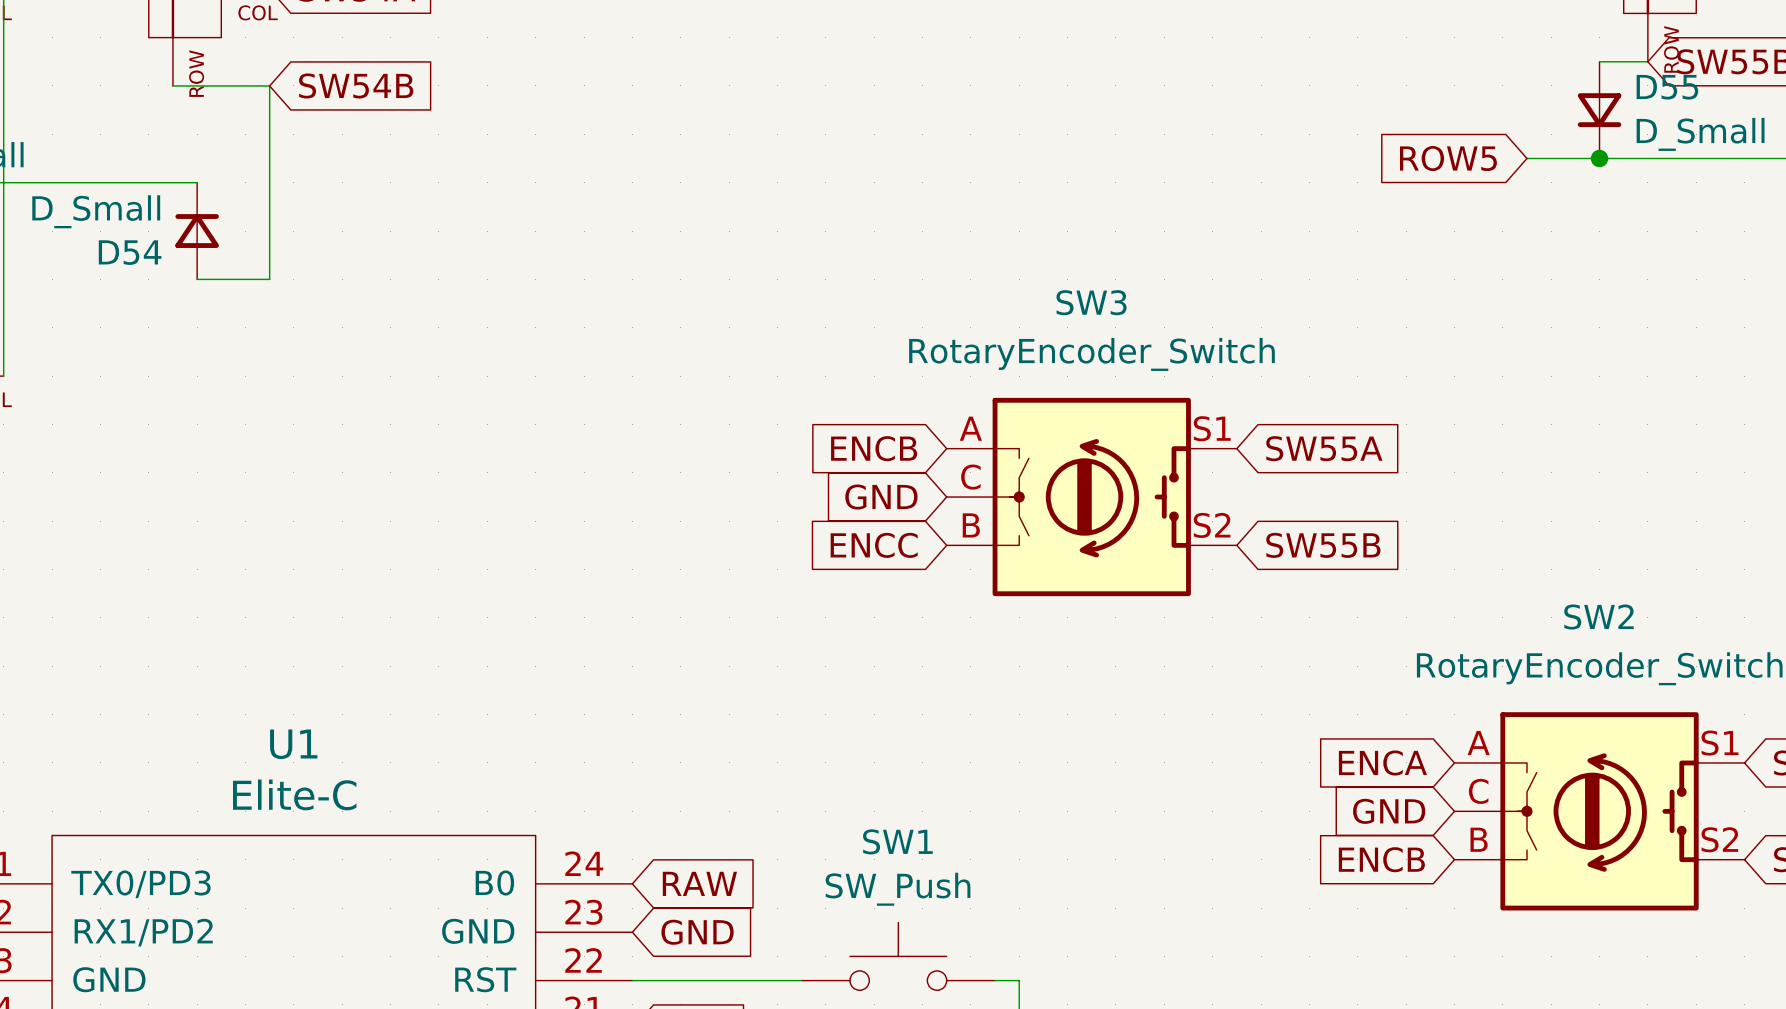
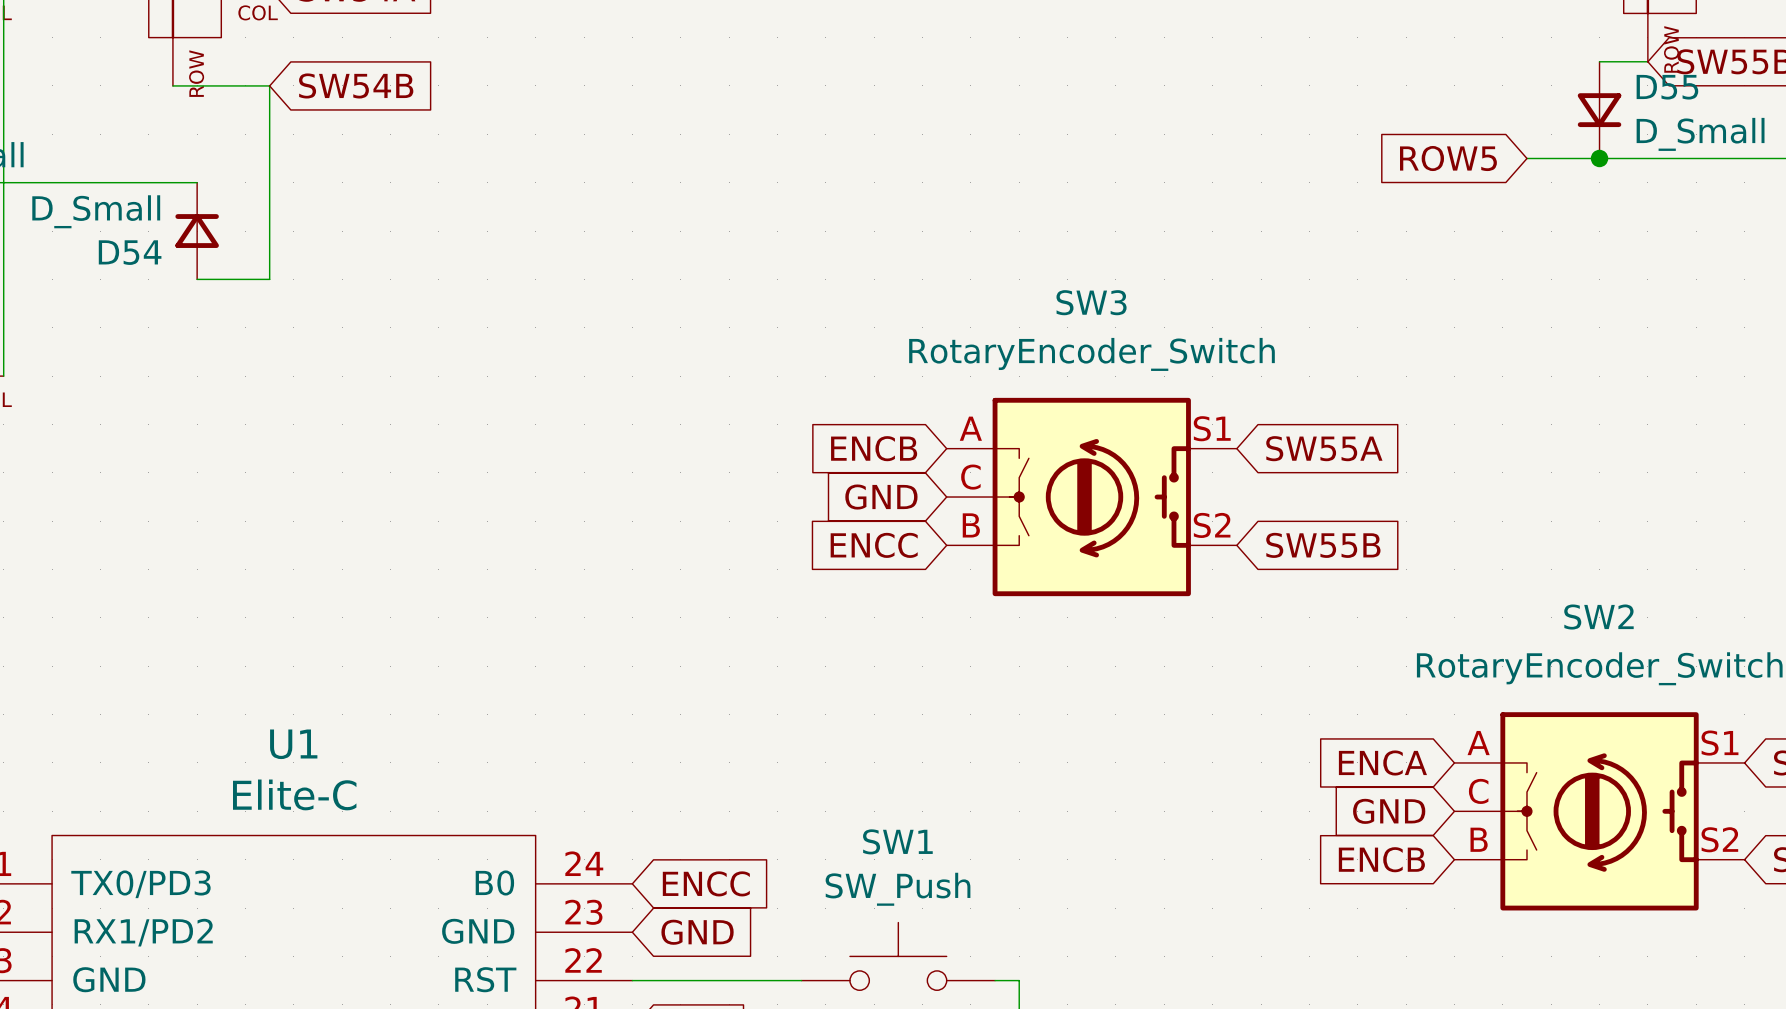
global label: RAW (699, 883) -> ENCC (706, 883)

